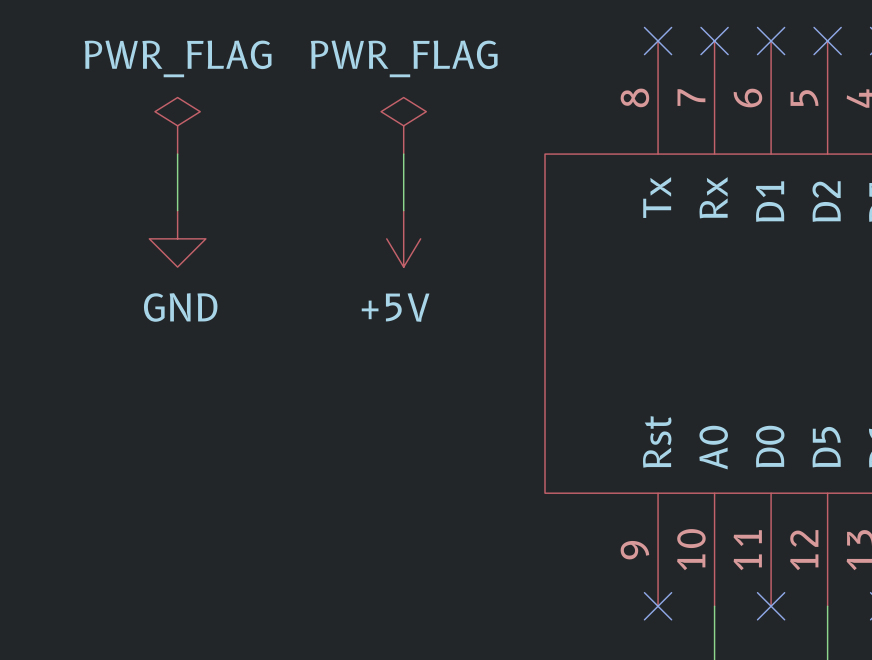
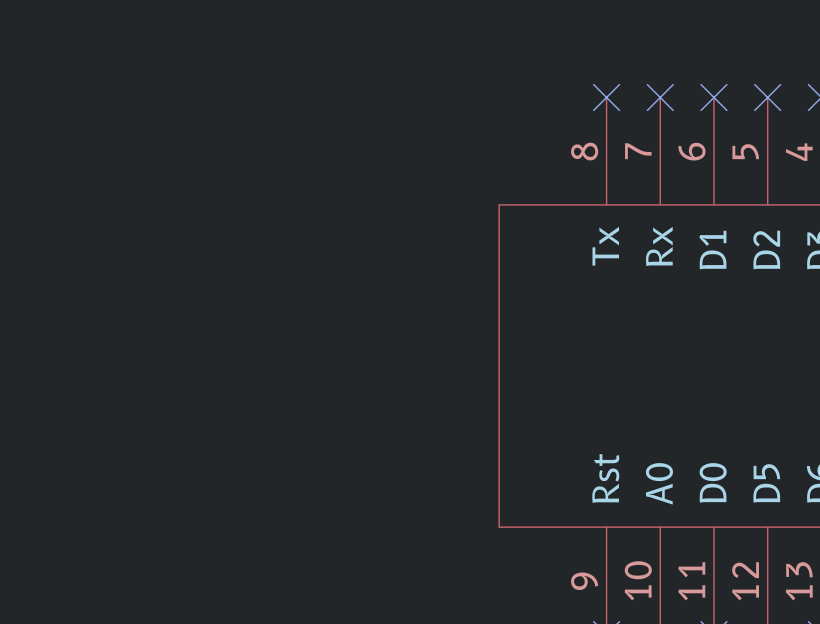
power symbol: PWR_FLAG (177, 125) -> none
power symbol: PWR_FLAG (403, 125) -> none
wire: (177, 154) (177, 210) -> none
wire: (403, 154) (403, 210) -> none
power symbol: GND (177, 238) -> none
power symbol: +5V (403, 238) -> none

